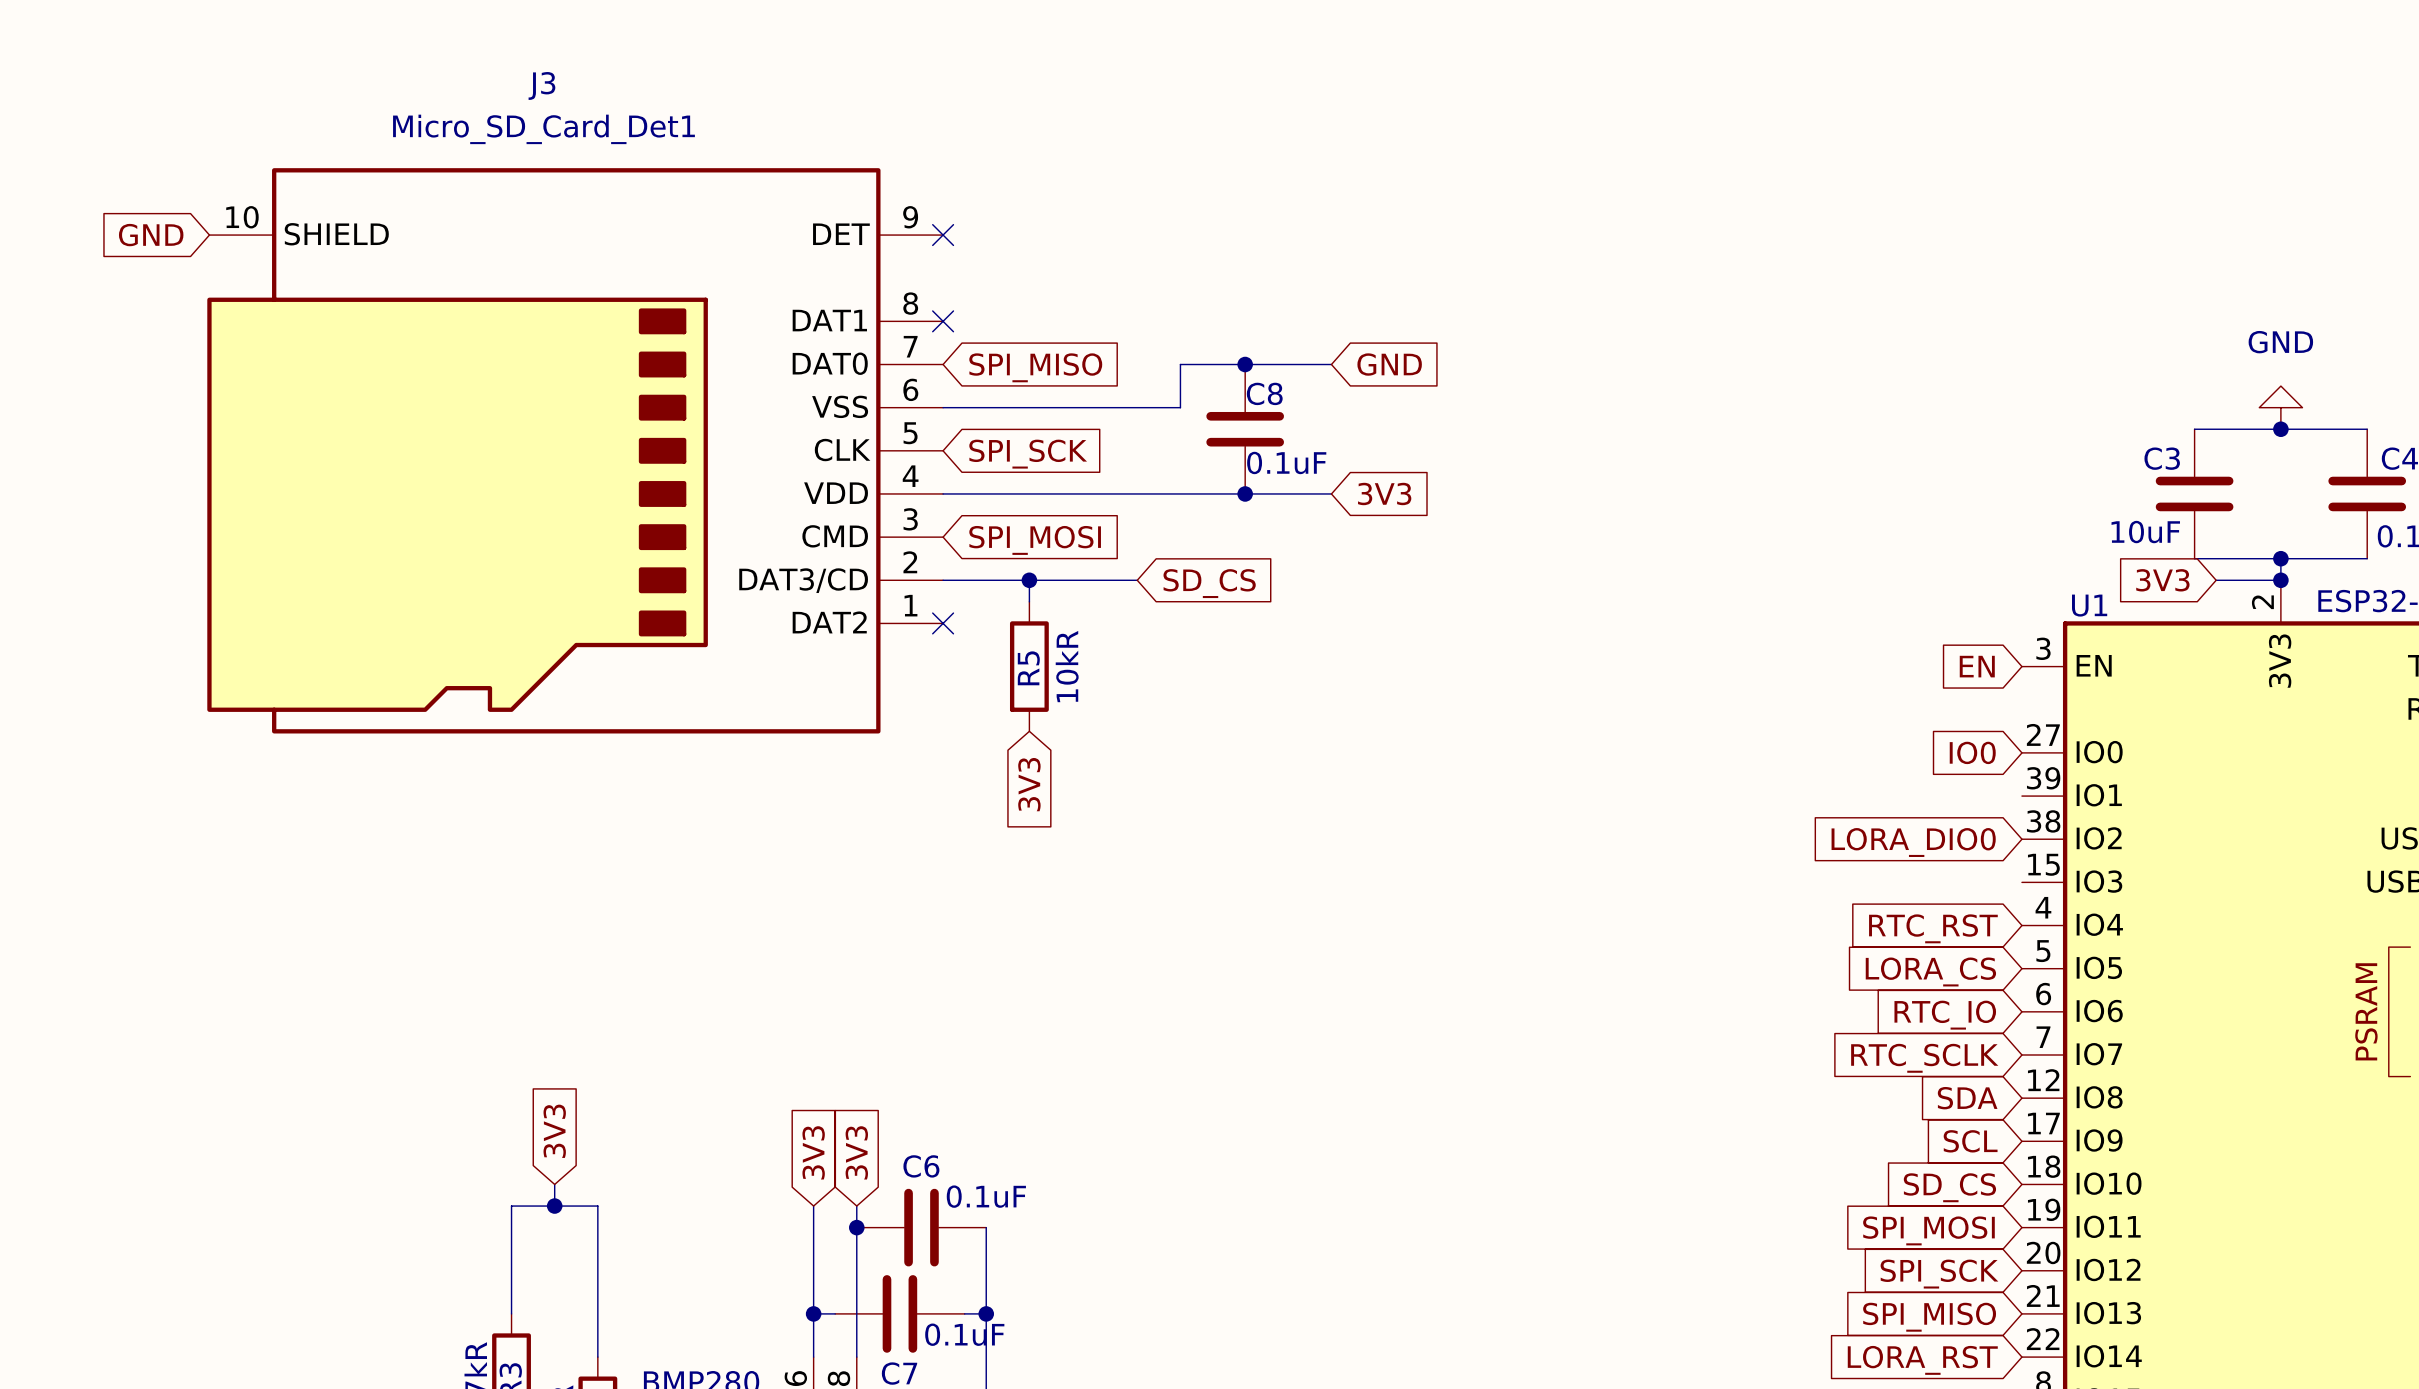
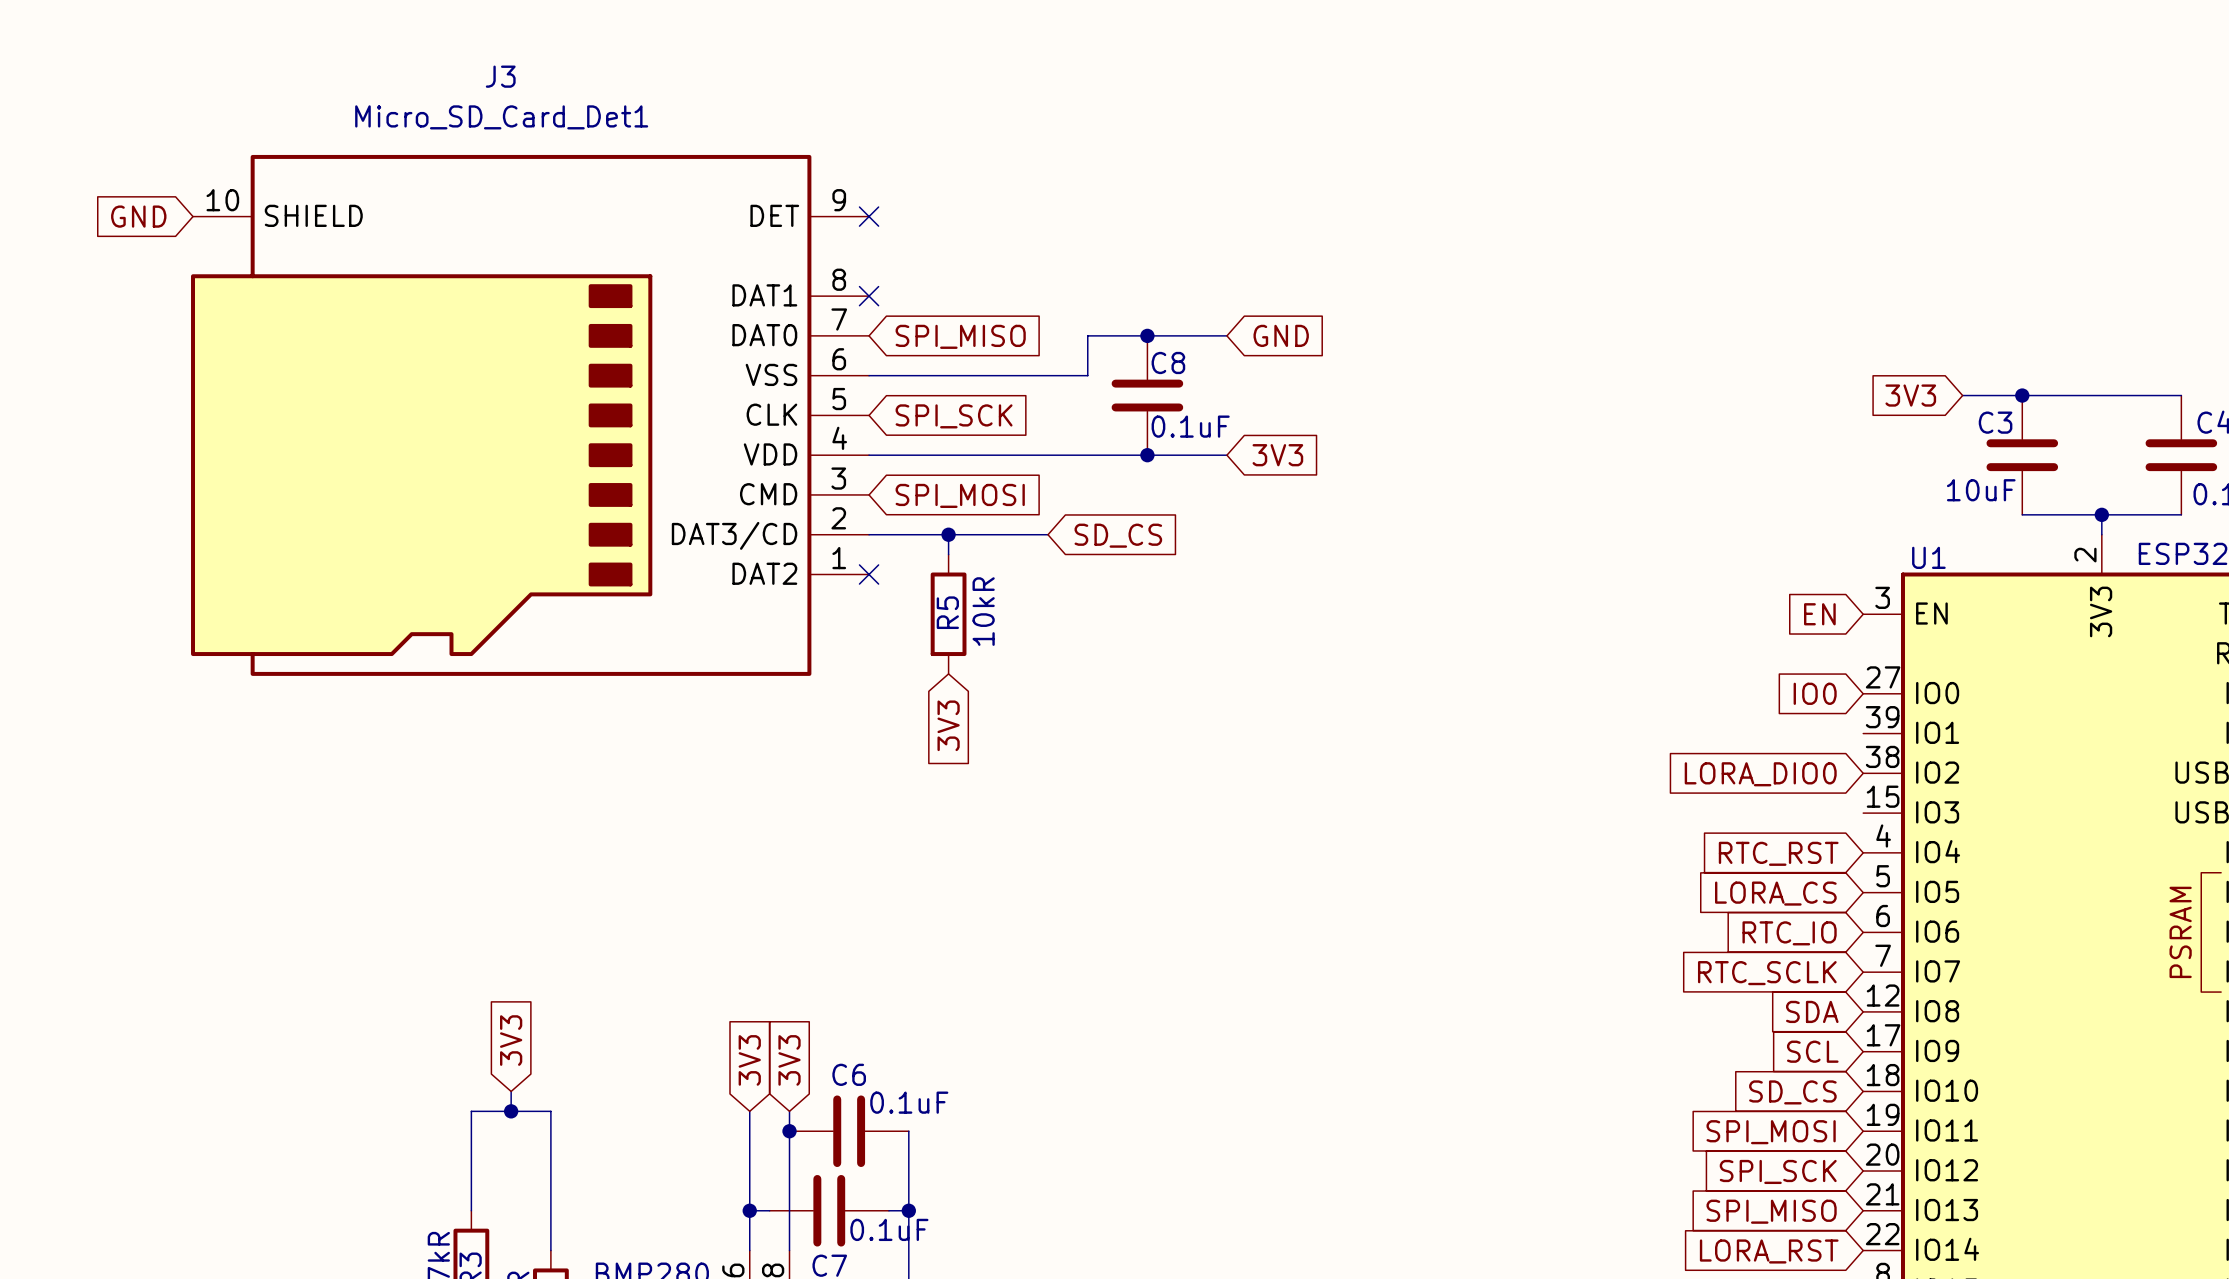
power symbol: GND (2280, 407) -> none
junction position: (2280, 429) -> (2022, 395)
global label position: 3V3 (2162, 580) -> 3V3 (1910, 395)
wire: (2216, 580) (2280, 580) -> (1962, 395) (2022, 395)
junction: (2280, 580) -> none

